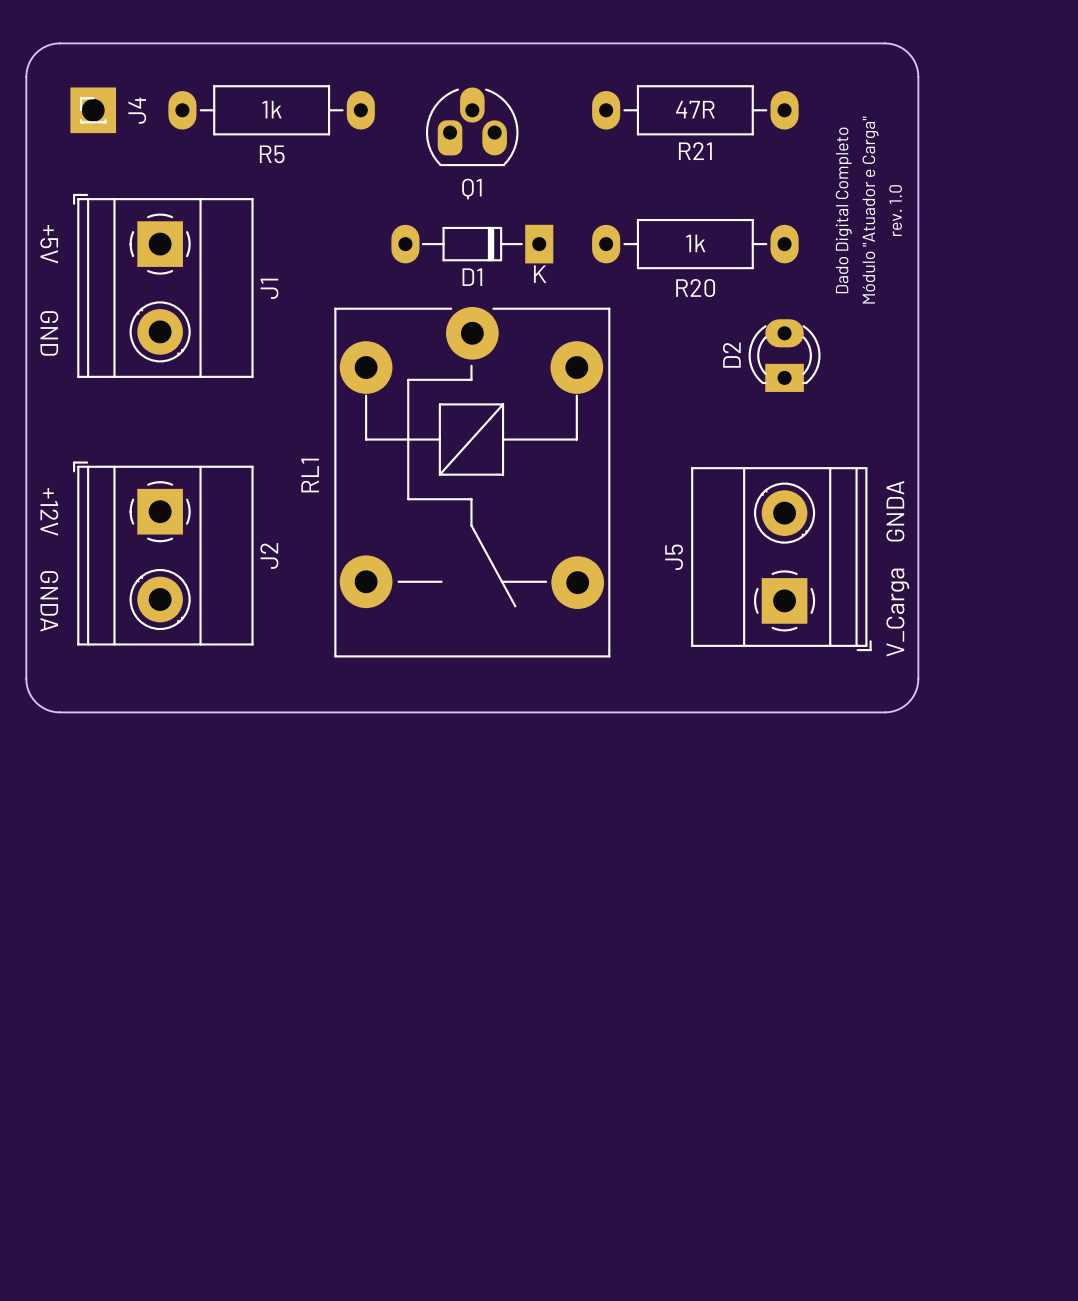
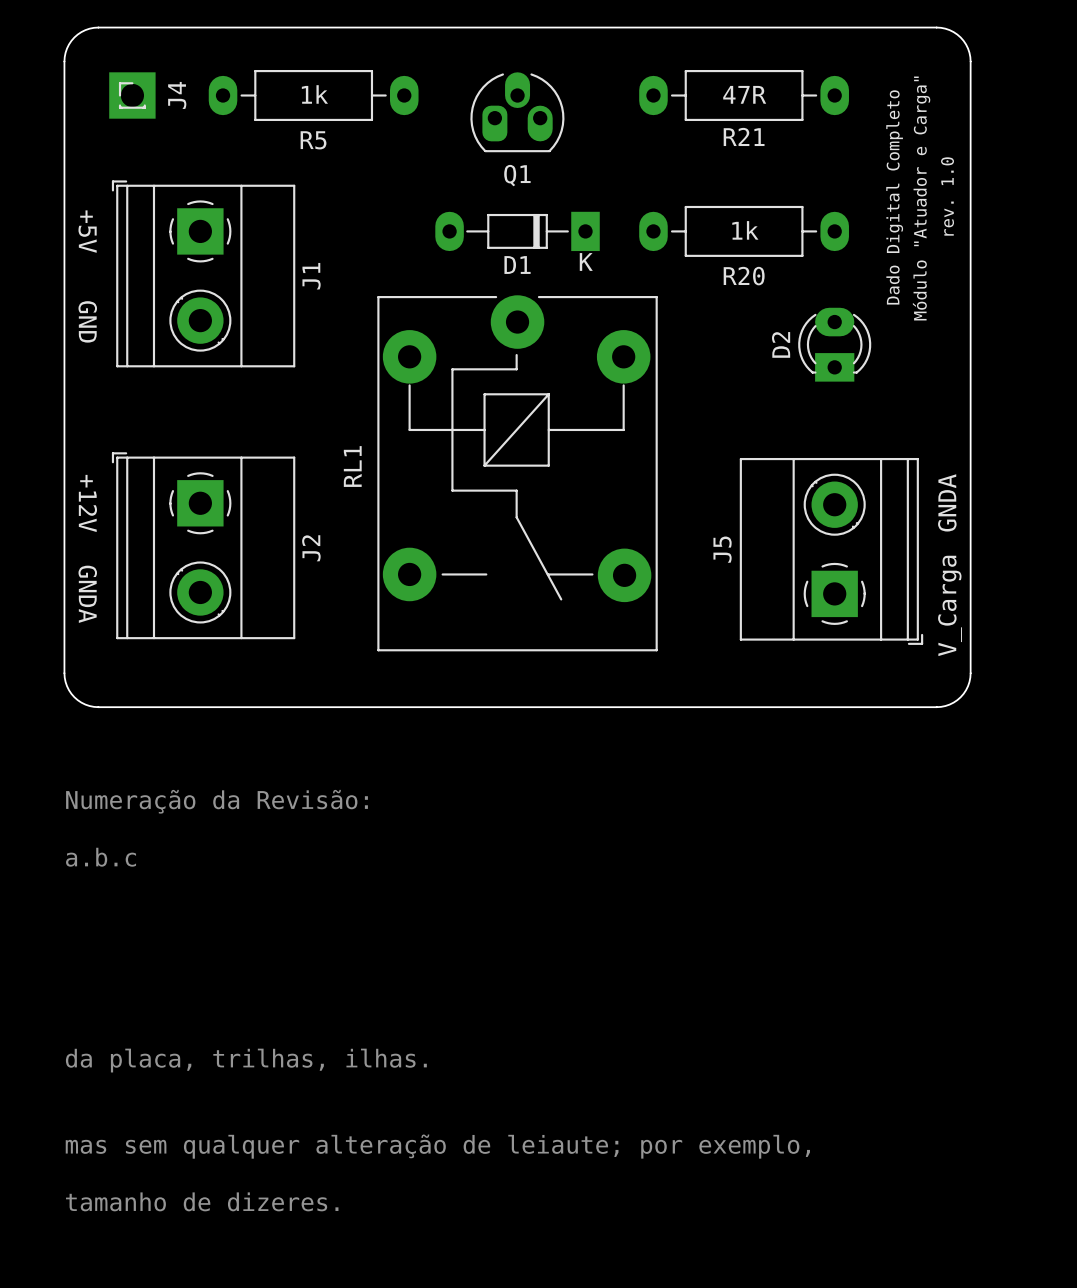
text: none -> Numeração da Revisão: (217, 801)
text: none -> a.b.c (101, 857)
text: none -> da placa, trilhas, ilhas. (246, 1060)
text: none -> mas sem qualquer alteração de leiaute; por exemplo, (437, 1146)
text: none -> tamanho de dizeres. (202, 1201)

